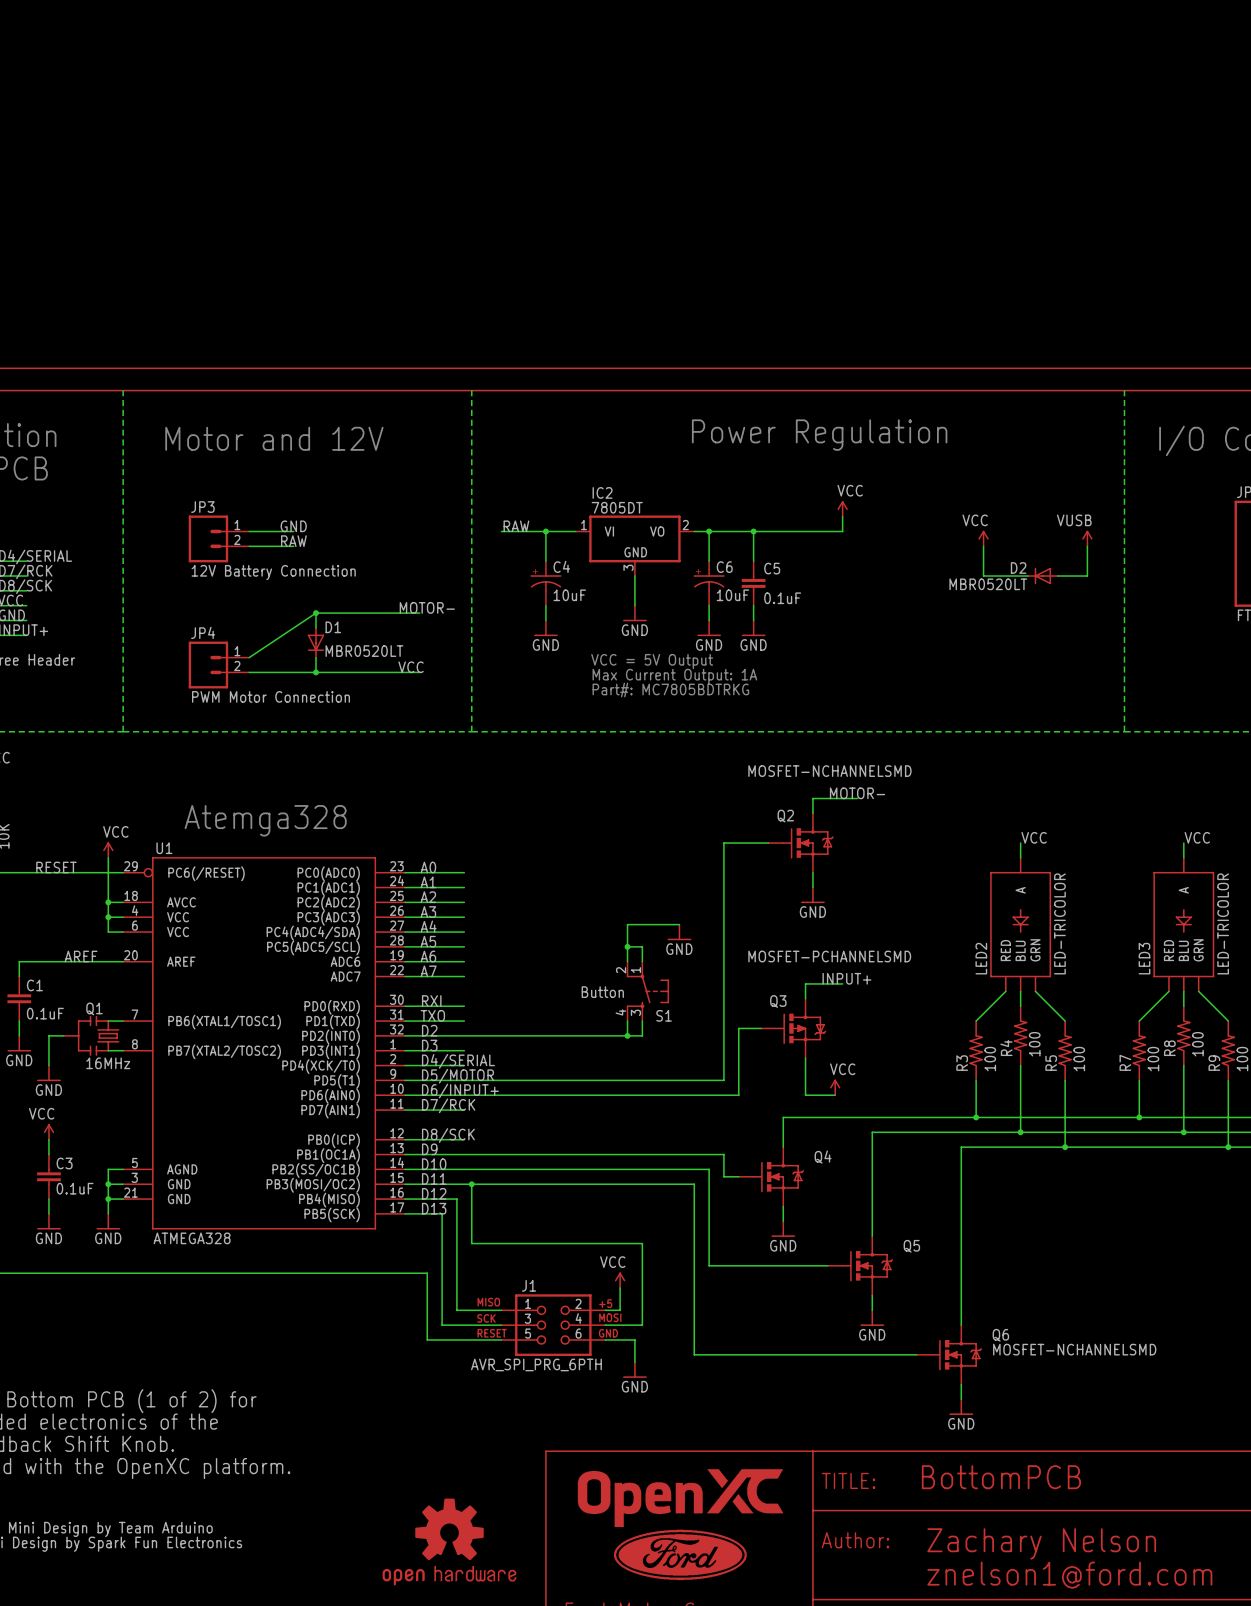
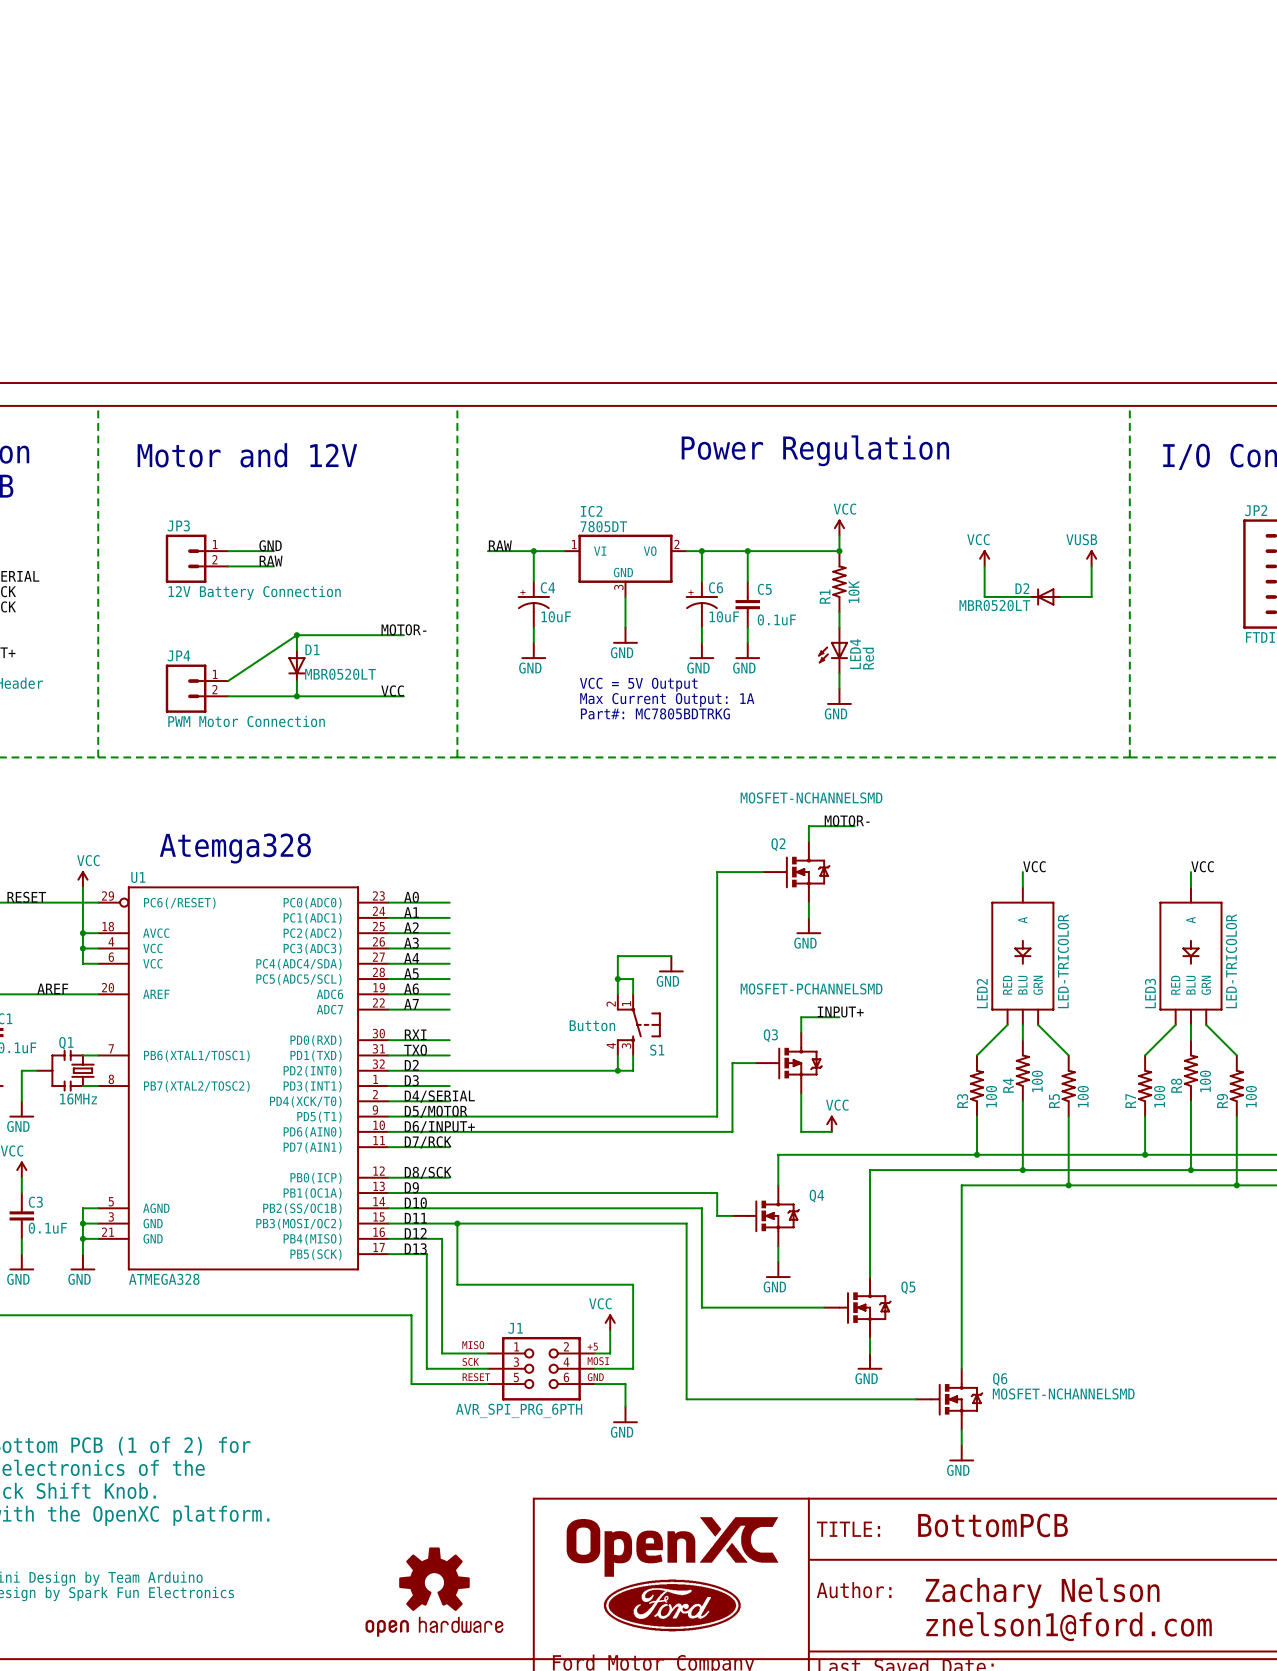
junction: none -> (839, 551)
R1: none -> 10K (839, 581)
wire: none -> (839, 612) (839, 627)
LED4: none -> Red (833, 650)
wire: none -> (839, 673) (839, 688)
power symbol: none -> GND (839, 696)

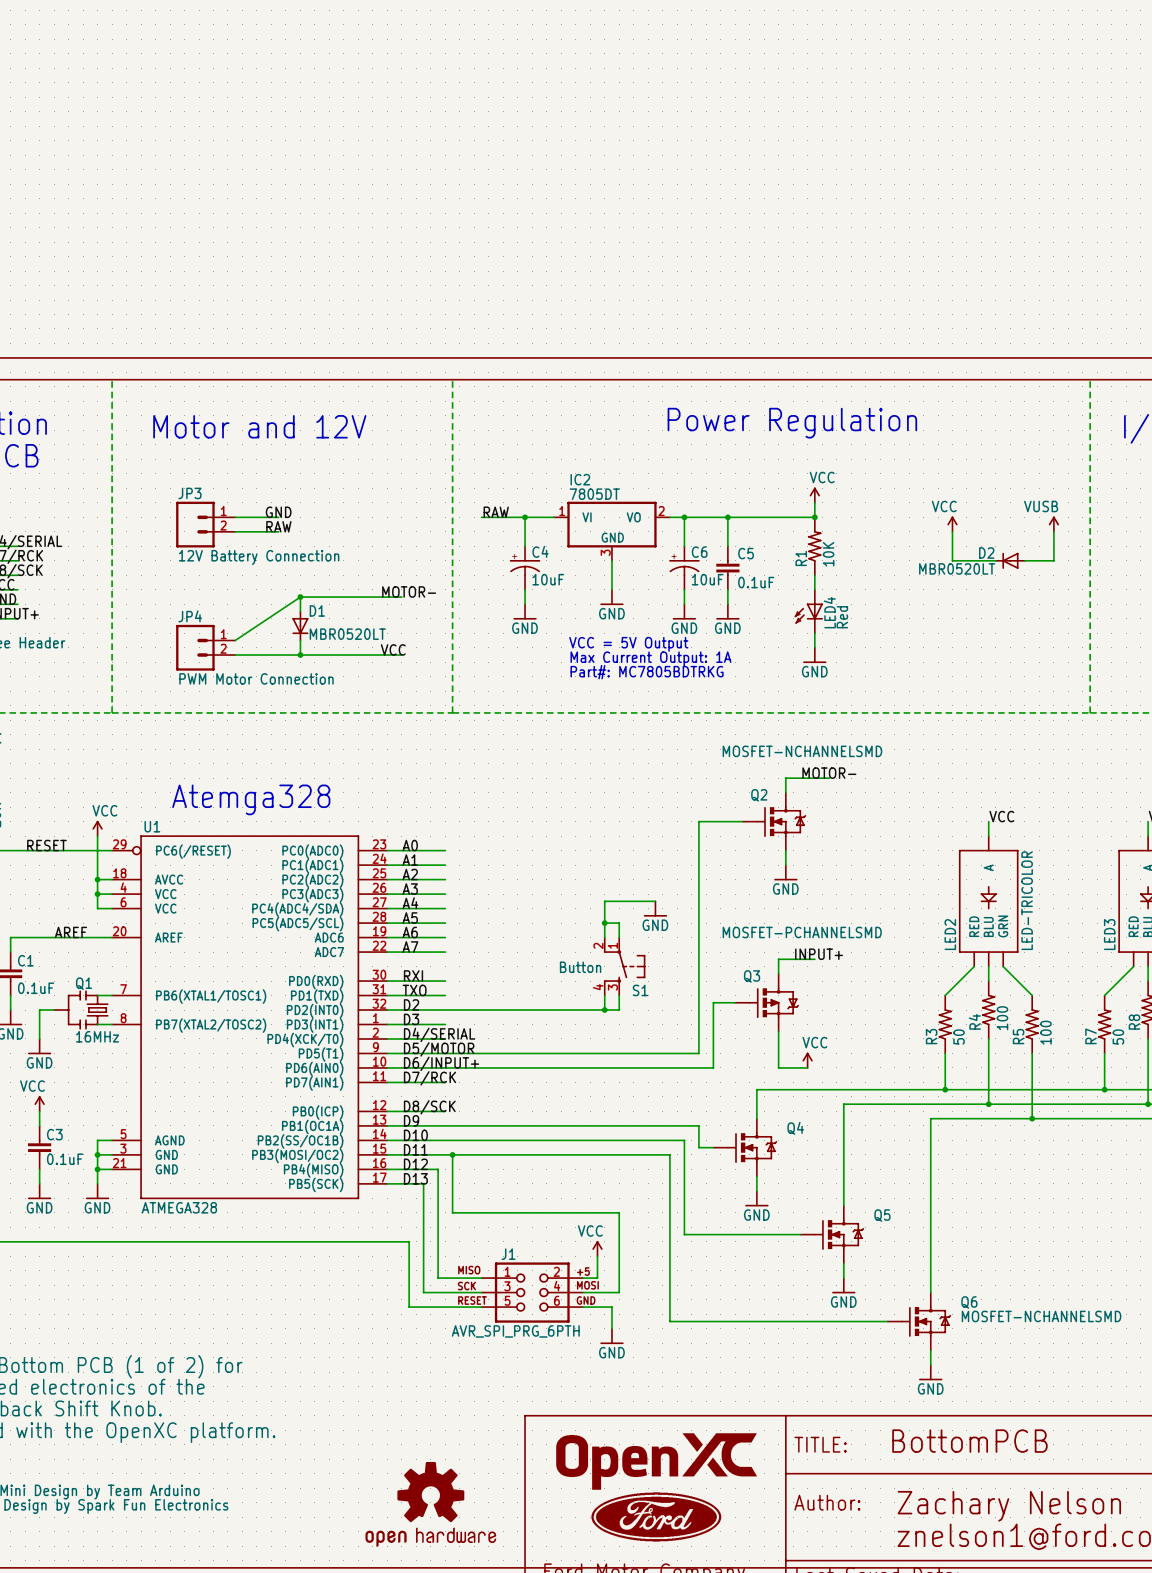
R3 value: 100 (991, 1096) -> 50 (959, 1037)
R7 value: 100 (1159, 1096) -> 50 (1118, 1037)

